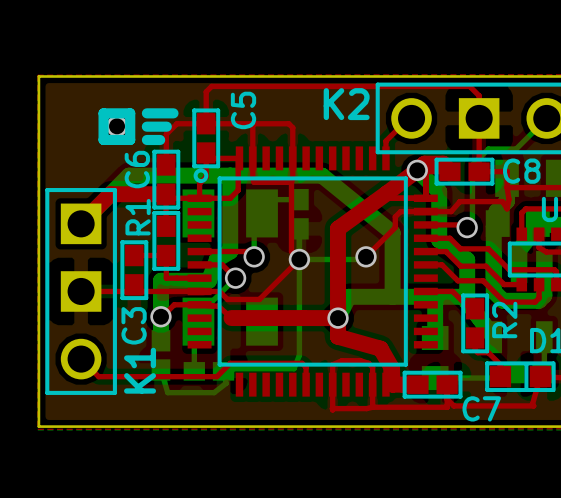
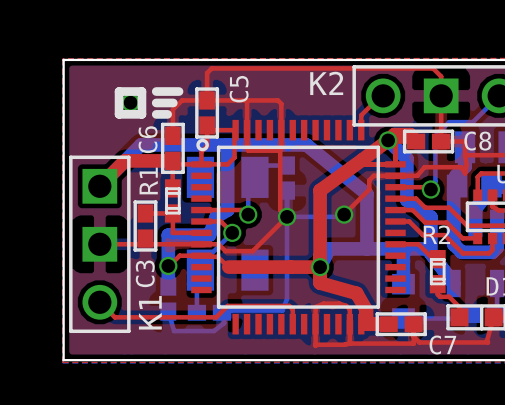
R1 footprint: [152, 210, 181, 271] -> [164, 179, 181, 223]
R2 footprint: [461, 293, 490, 354] -> [429, 250, 446, 294]
R2 name rotation: 0° (504, 319) -> 90° clockwise (436, 234)

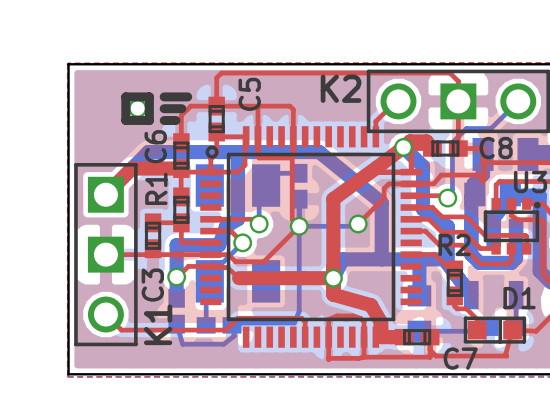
C5 footprint: [195, 87, 220, 139] -> [208, 96, 225, 142]
C6 footprint: [160, 122, 185, 175] -> [173, 133, 190, 178]
C8 footprint: [402, 129, 455, 154] -> [423, 140, 468, 157]
C3 footprint: [133, 200, 158, 252] -> [144, 213, 162, 259]
C7 footprint: [375, 312, 427, 337] -> [394, 328, 440, 346]

